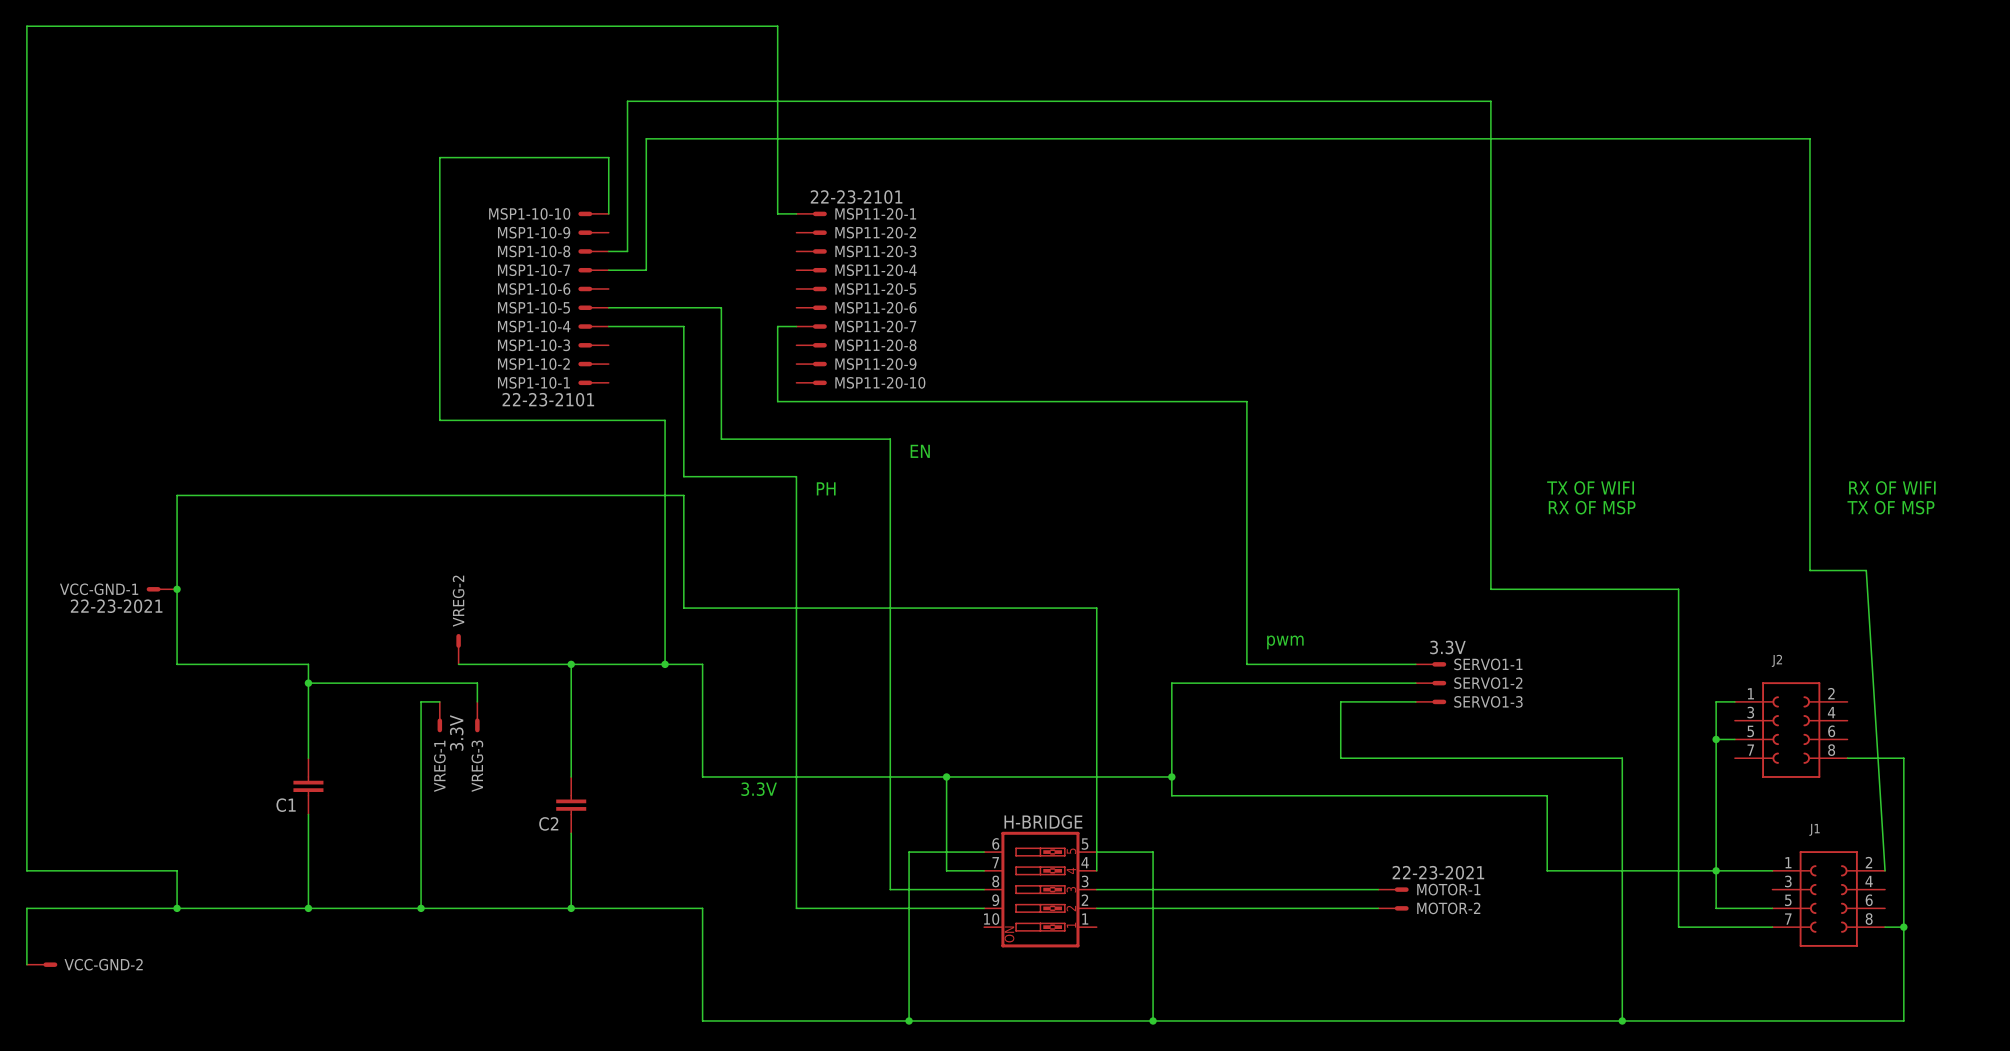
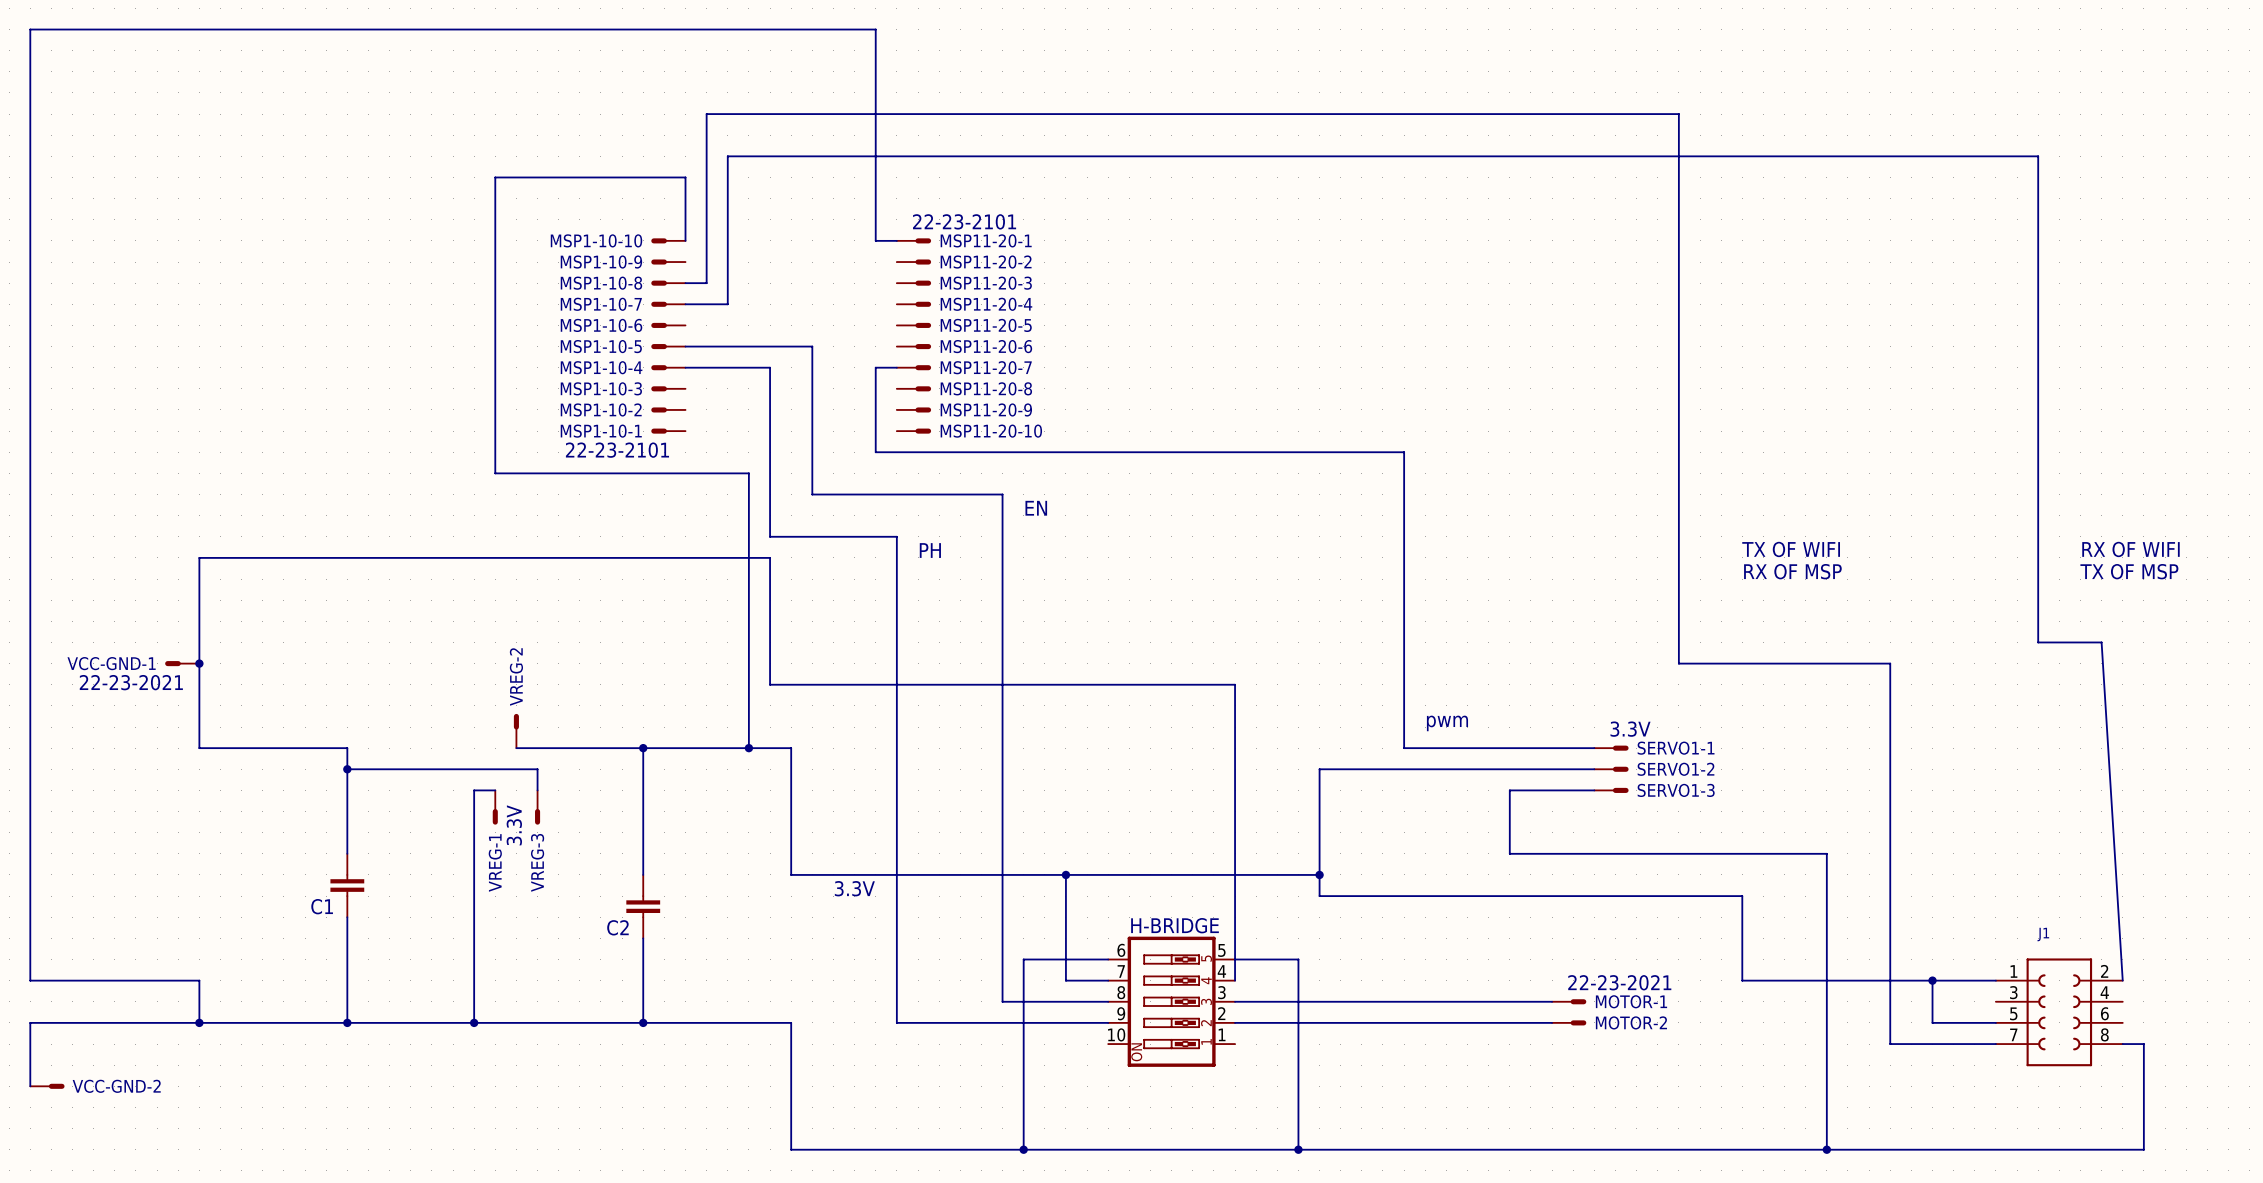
wire: (1734, 701) (1716, 701) (1716, 870) -> none
J2: (1791, 730) -> none
wire: (1716, 739) (1734, 739) -> none
junction: (1716, 739) -> none
wire: (1847, 758) (1903, 758) (1903, 927) -> none
junction: (1903, 927) -> none

